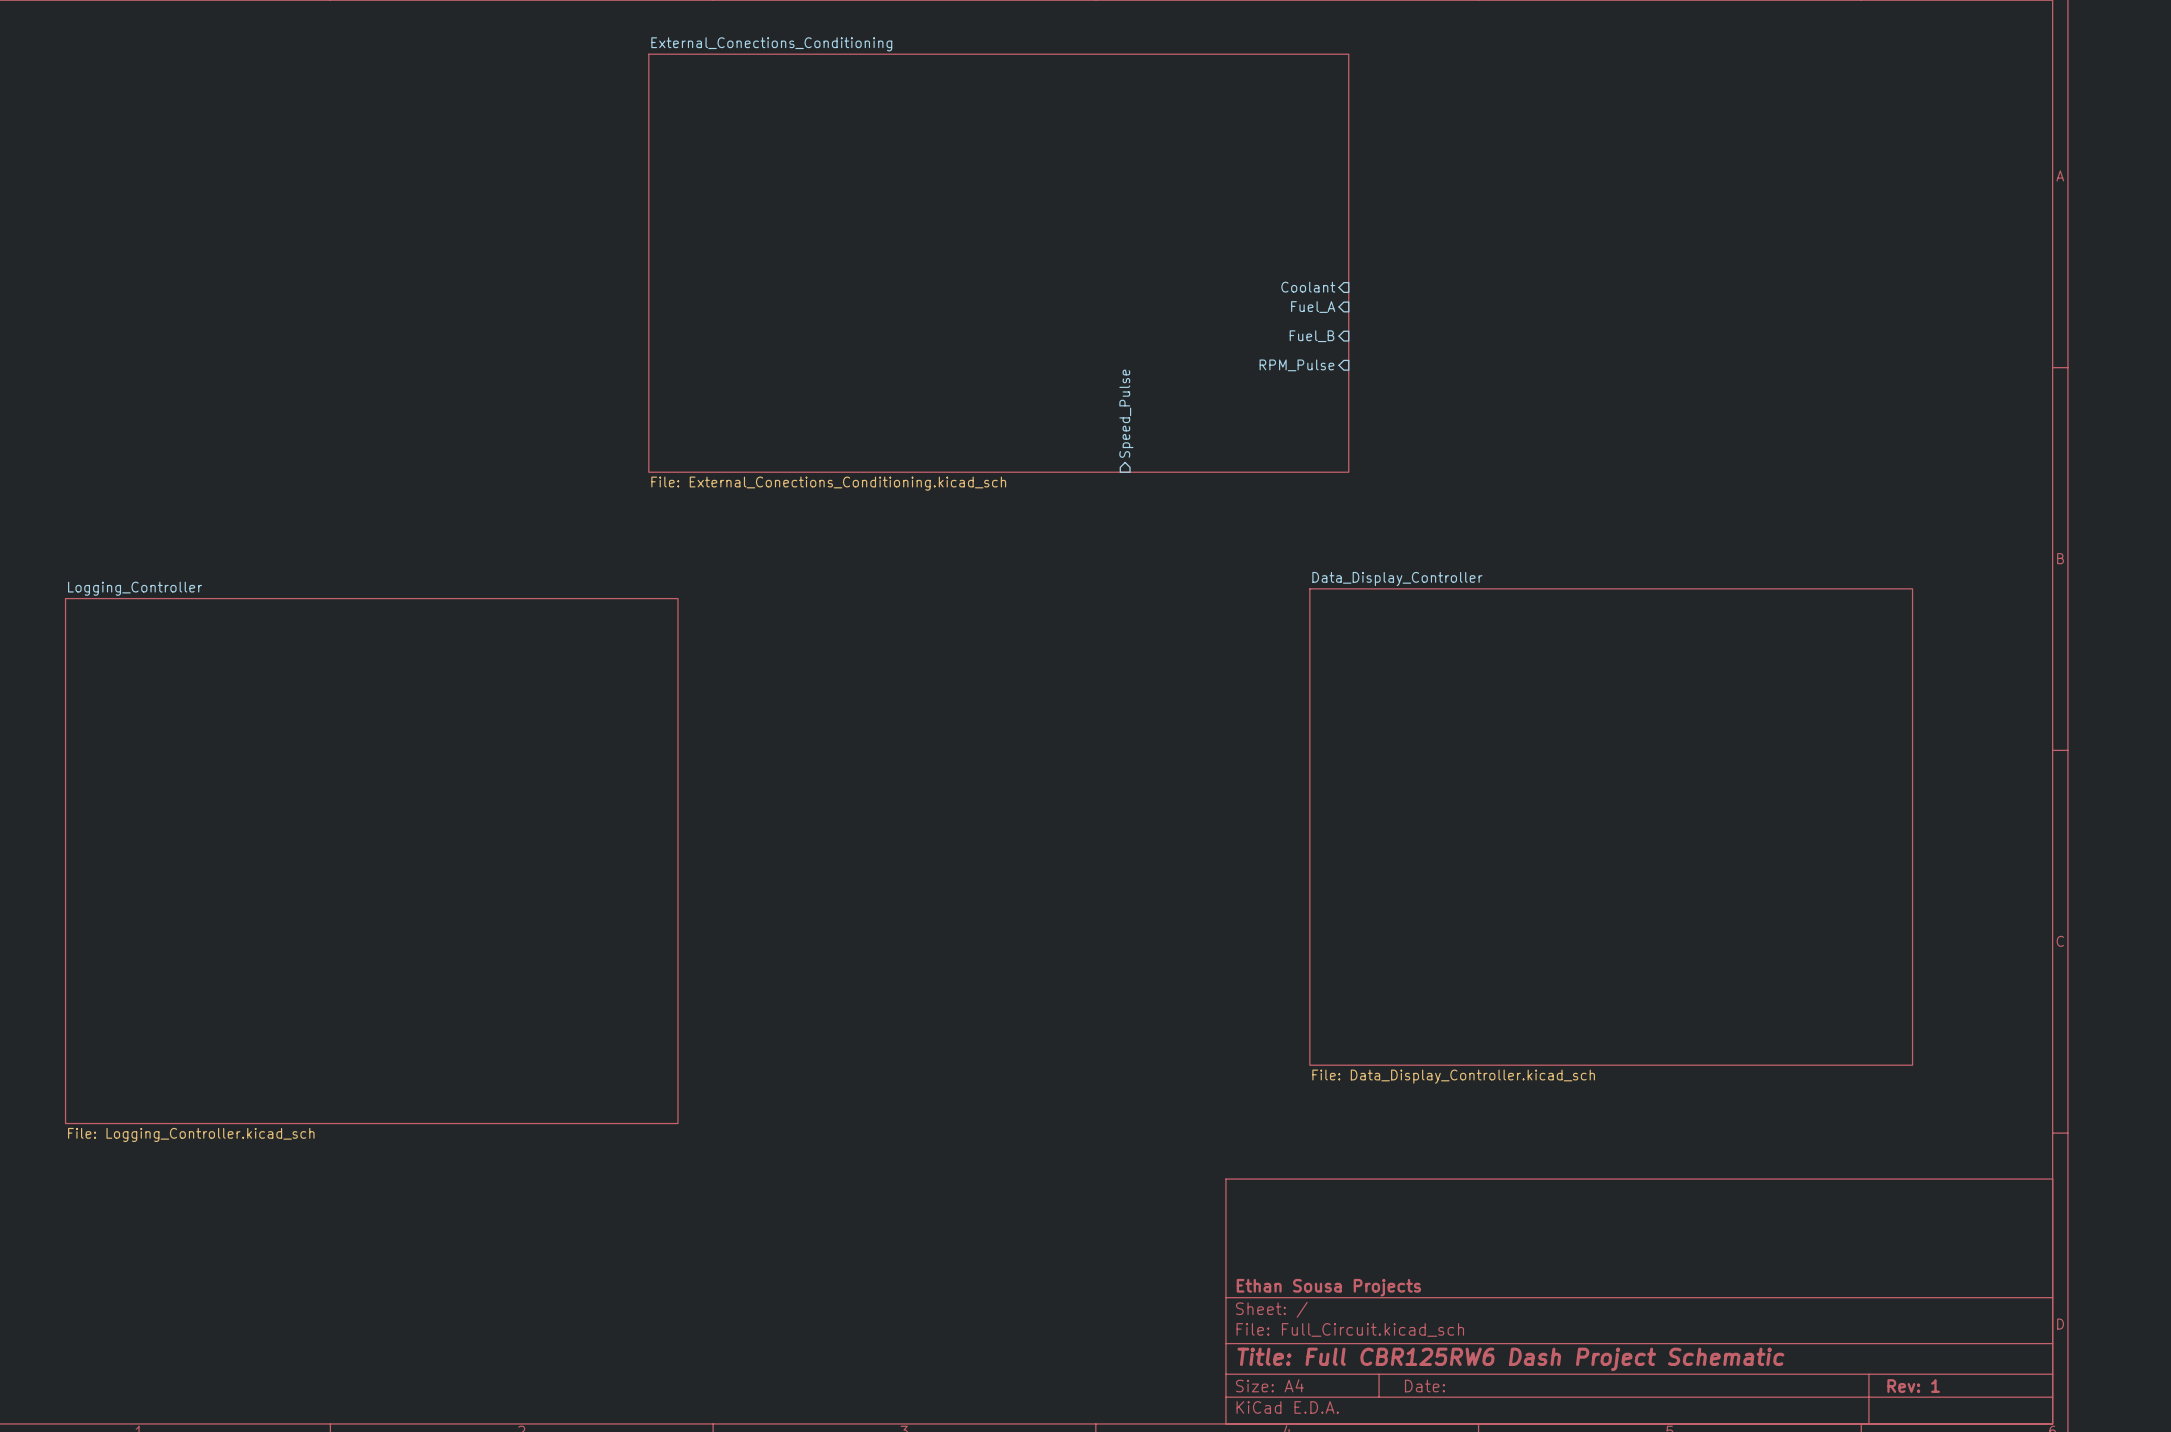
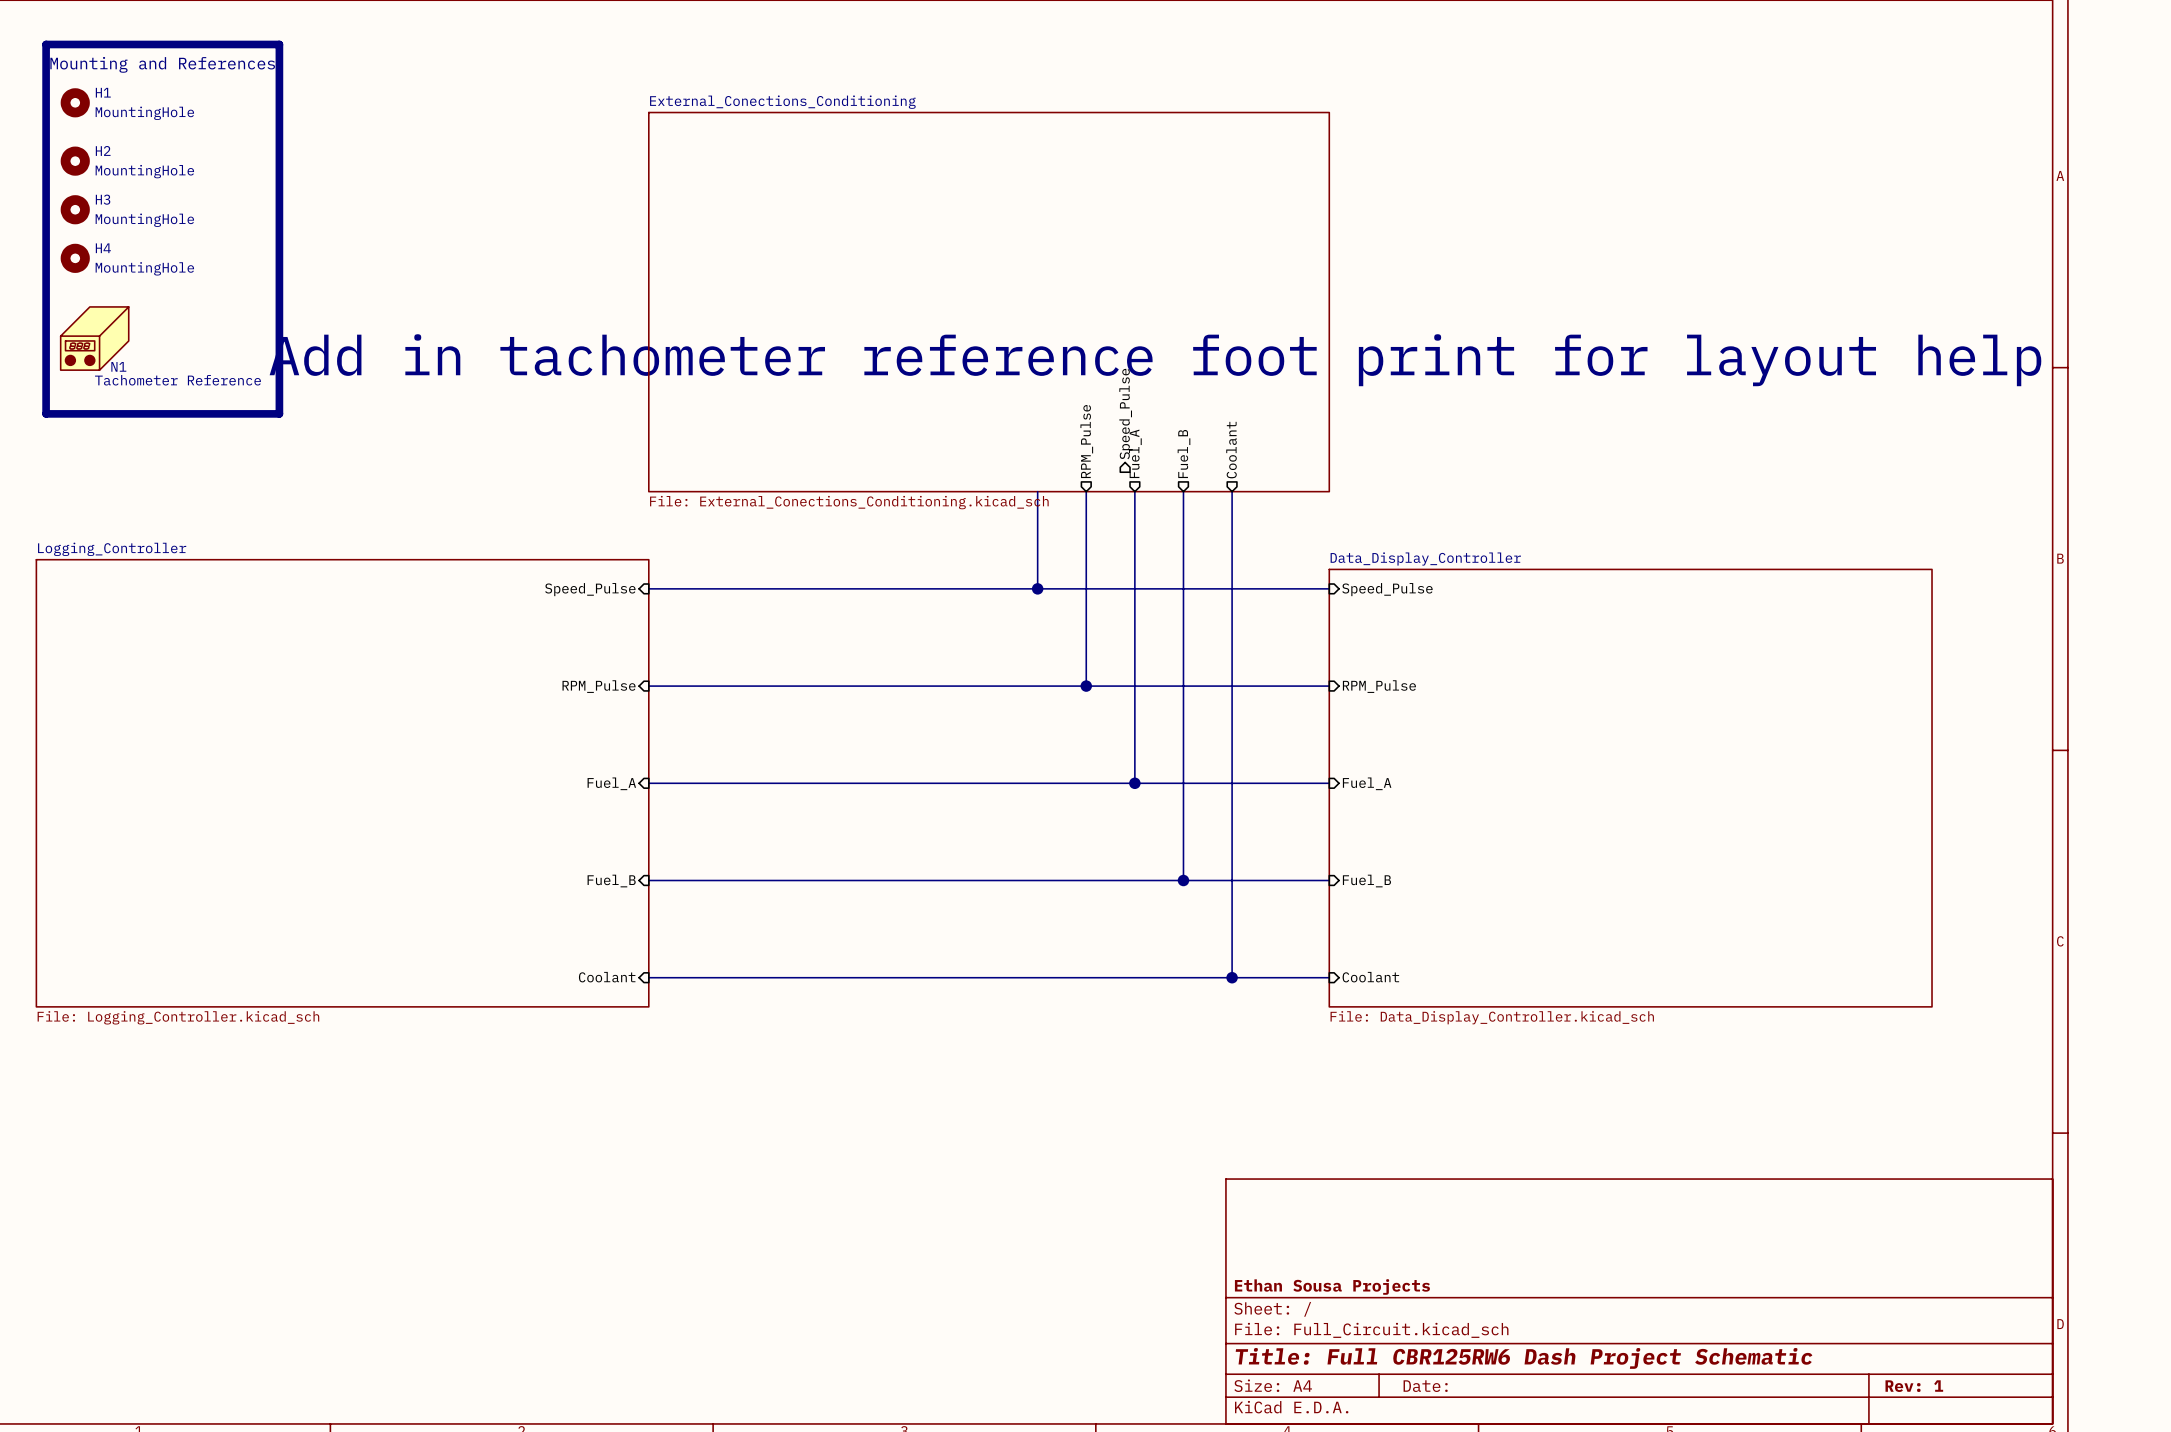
line: none -> (46, 44) (279, 44) (279, 413) (46, 413) (46, 44)
text: none -> Mounting and References (162, 64)
H1: none -> MountingHole (75, 102)
H2: none -> MountingHole (75, 161)
H3: none -> MountingHole (75, 209)
H4: none -> MountingHole (75, 258)
sheet External_Conections_Conditioning: File: External_Conections_Conditioning.kicad_sch (998, 263) -> none
sheet pin: Coolant (1308, 287) -> none
sheet External_Conections_Conditioning: none -> File: External_Conections_Conditioning.kicad_sch (989, 302)
sheet pin: Fuel_A (1313, 307) -> none
sheet pin: Fuel_B (1312, 336) -> none
N1: none -> Tachometer Reference (94, 338)
text: none -> Add in tachometer reference foot print for layout help (1155, 360)
sheet pin: RPM_Pulse (1296, 365) -> none
sheet pin: none -> RPM_Pulse (1086, 441)
sheet pin: none -> Coolant (1231, 450)
sheet pin: none -> Fuel_A (1135, 453)
sheet pin: none -> Fuel_B (1184, 454)
wire: none -> (1037, 491) (1037, 588)
wire: none -> (1086, 491) (1086, 686)
wire: none -> (1134, 491) (1134, 783)
wire: none -> (1183, 491) (1183, 880)
wire: none -> (1232, 491) (1232, 977)
wire: none -> (648, 588) (1329, 588)
junction: none -> (1037, 588)
sheet pin: none -> Speed_Pulse (590, 589)
sheet pin: none -> Speed_Pulse (1387, 589)
sheet pin: none -> RPM_Pulse (599, 686)
wire: none -> (648, 686) (1329, 686)
junction: none -> (1086, 686)
sheet pin: none -> RPM_Pulse (1379, 686)
sheet Logging_Controller: none -> File: Logging_Controller.kicad_sch (342, 783)
sheet pin: none -> Fuel_A (611, 783)
wire: none -> (648, 783) (1329, 783)
junction: none -> (1134, 783)
sheet pin: none -> Fuel_A (1367, 783)
sheet Data_Display_Controller: none -> File: Data_Display_Controller.kicad_sch (1630, 788)
sheet Data_Display_Controller: File: Data_Display_Controller.kicad_sch (1611, 827) -> none
sheet Logging_Controller: File: Logging_Controller.kicad_sch (371, 861) -> none
sheet pin: none -> Fuel_B (611, 881)
wire: none -> (648, 880) (1329, 880)
junction: none -> (1183, 880)
sheet pin: none -> Fuel_B (1366, 881)
sheet pin: none -> Coolant (607, 977)
wire: none -> (648, 977) (1329, 977)
junction: none -> (1232, 977)
sheet pin: none -> Coolant (1370, 977)

